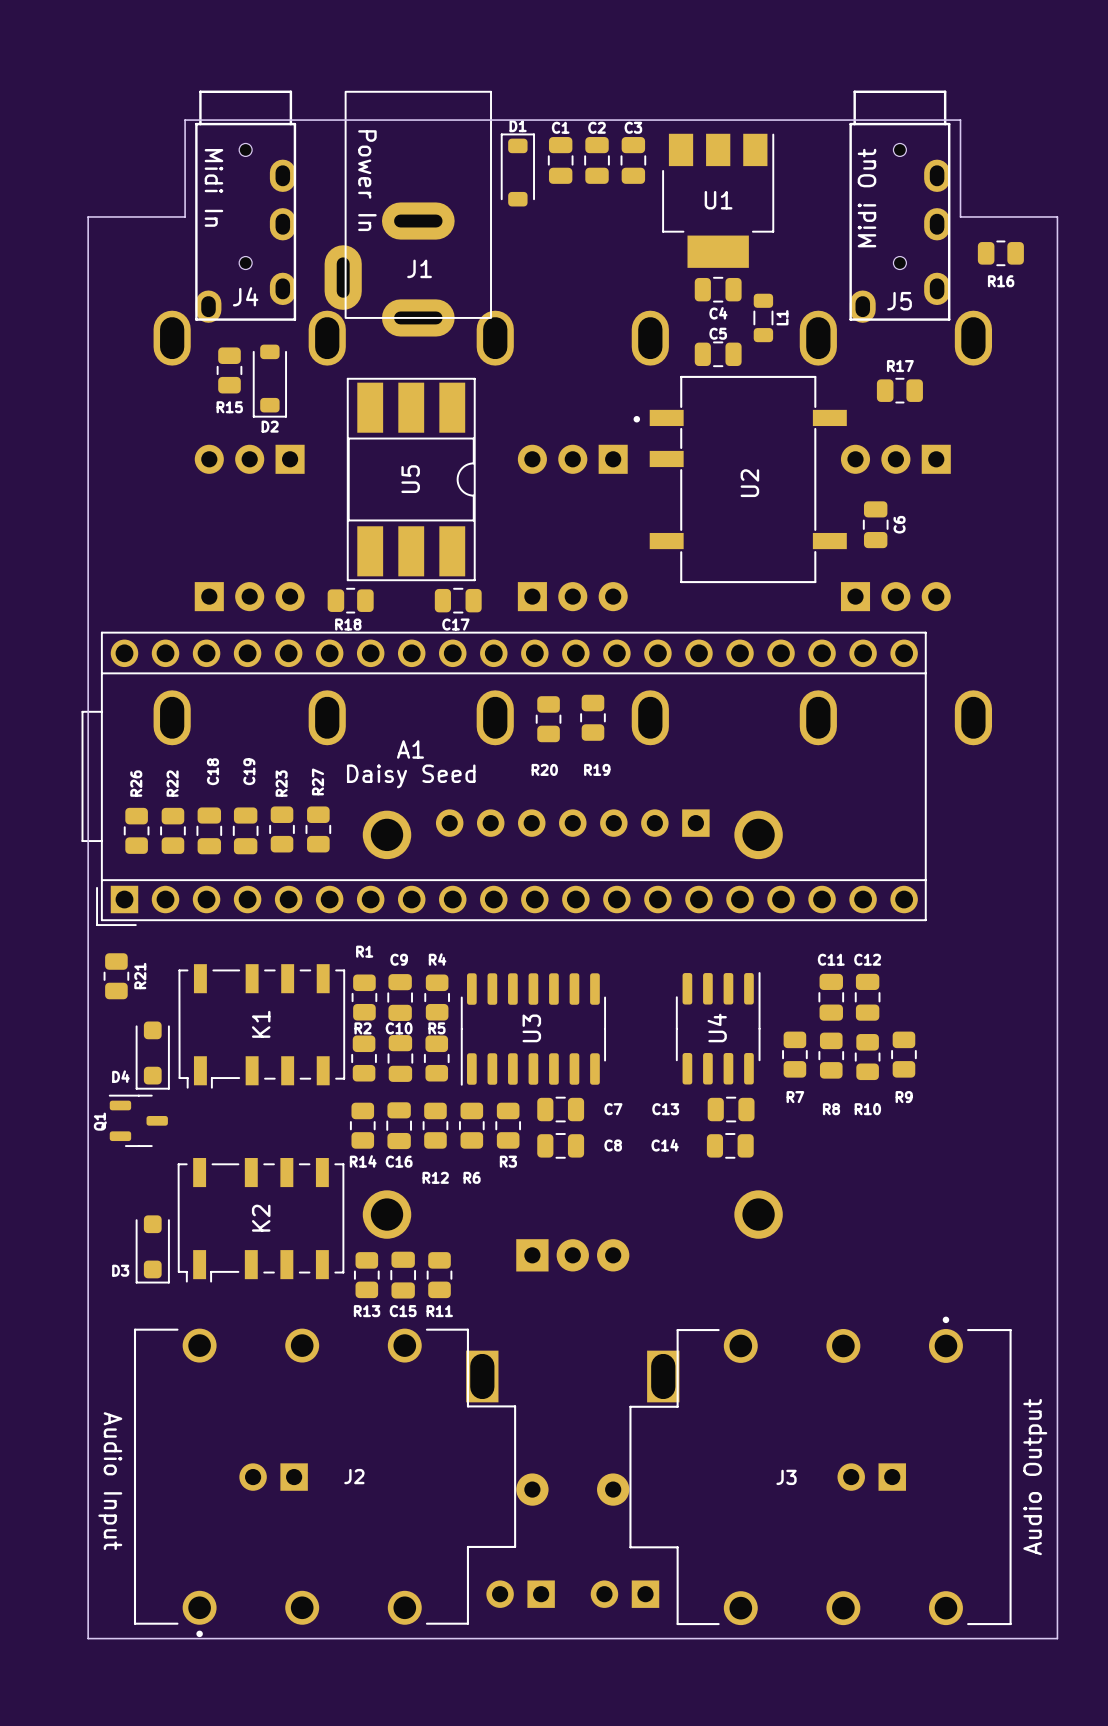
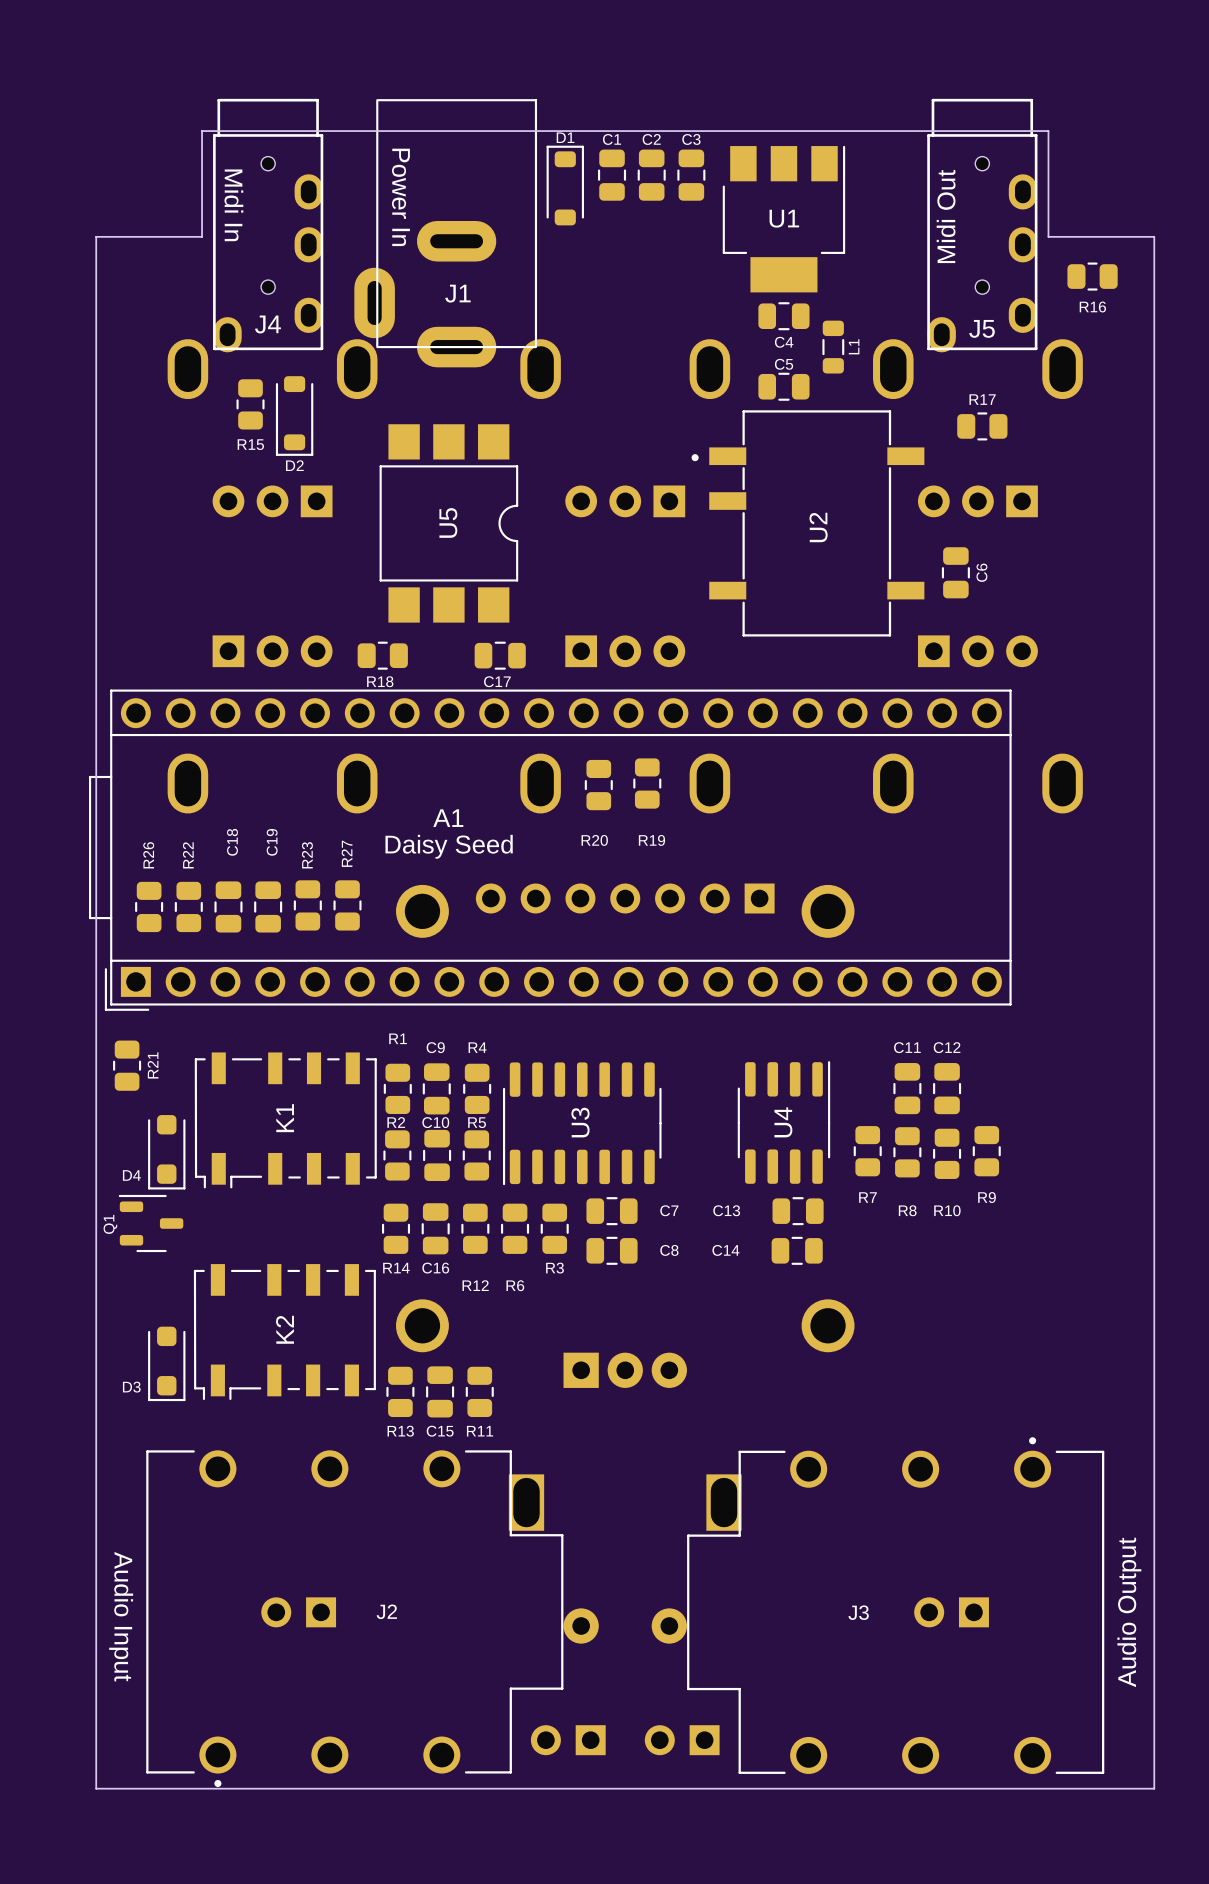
U5 footprint: [346, 377, 476, 582] -> [379, 424, 519, 623]

